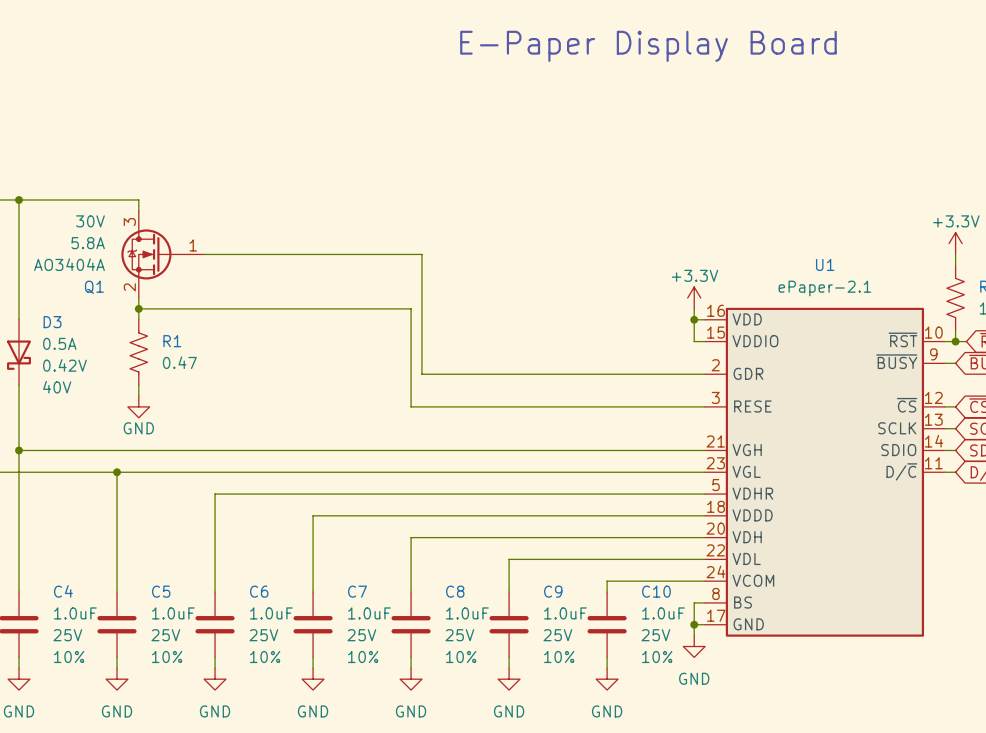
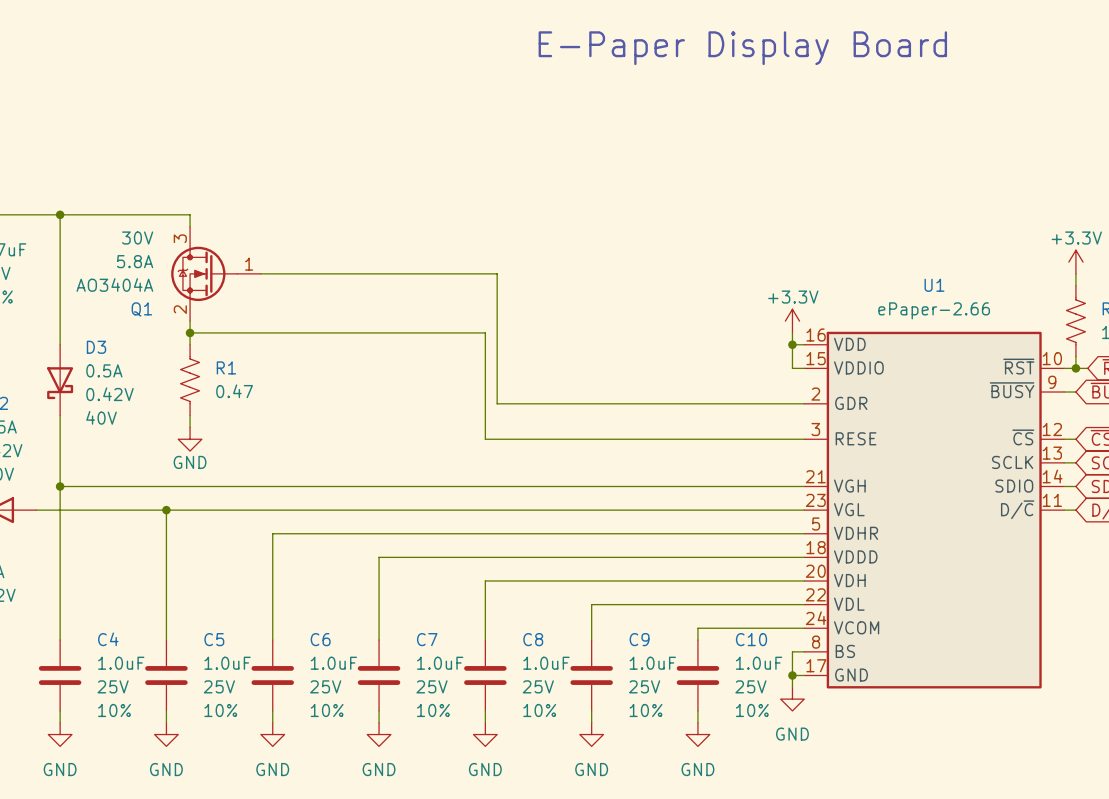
U1 value: ePaper-2.1 (824, 288) -> ePaper-2.66 (934, 310)

